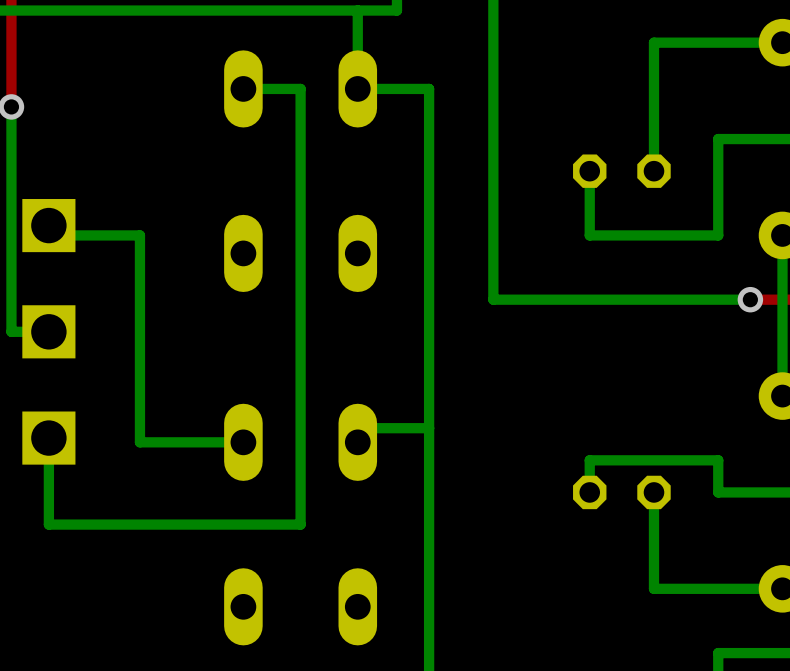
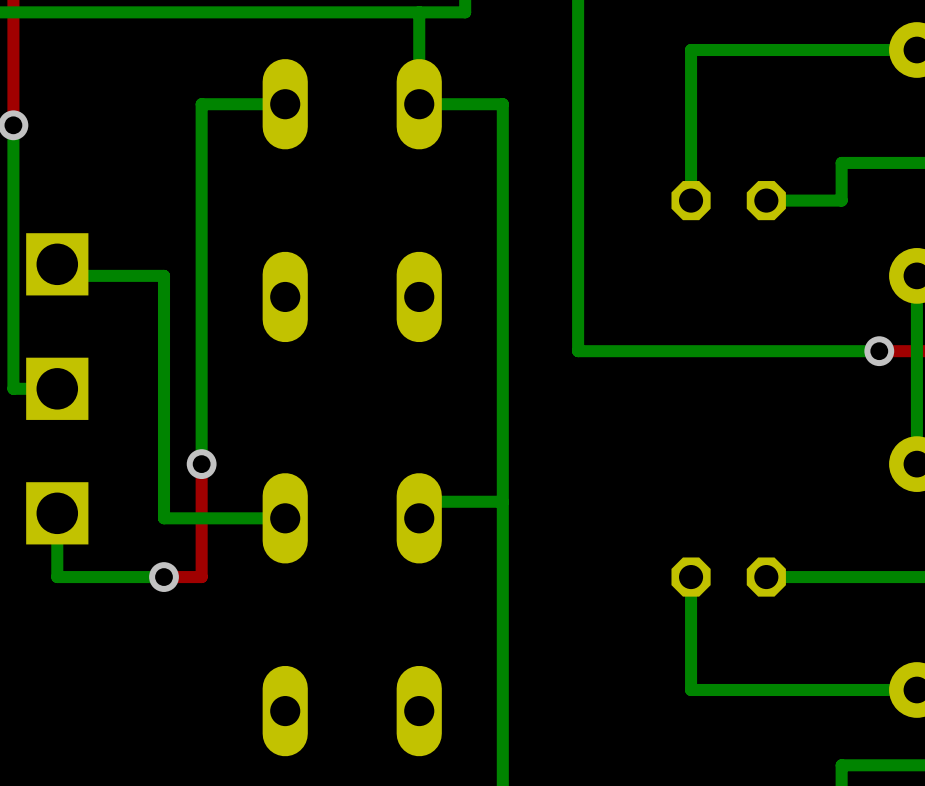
bottom track: (653, 42) (653, 171) -> (766, 50) (691, 50) (691, 200)
bottom track: (243, 88) (300, 88) (300, 524) (48, 524) (48, 492) -> (285, 104) (201, 104) (201, 464)
bottom track: (718, 171) (718, 235) (589, 235) (589, 171) -> (841, 200) (766, 200)
top track: none -> (201, 464) (201, 577) (164, 577)
via: none -> (201, 464)
bottom track: none -> (164, 577) (57, 577)
via: none -> (164, 577)
bottom track: (653, 492) (653, 588) -> (691, 577) (691, 689) (766, 689)
bottom track: (718, 492) (718, 460) (589, 460) (589, 492) -> (841, 577) (766, 577)

